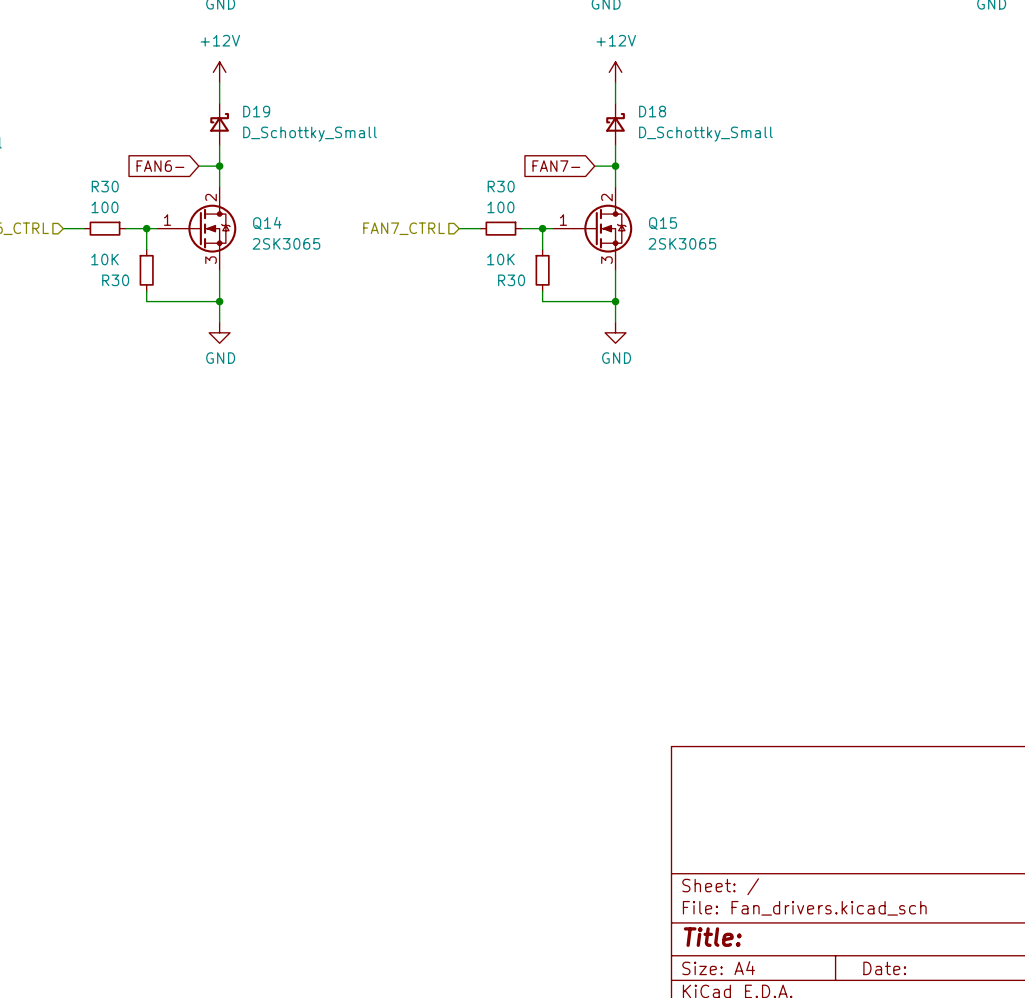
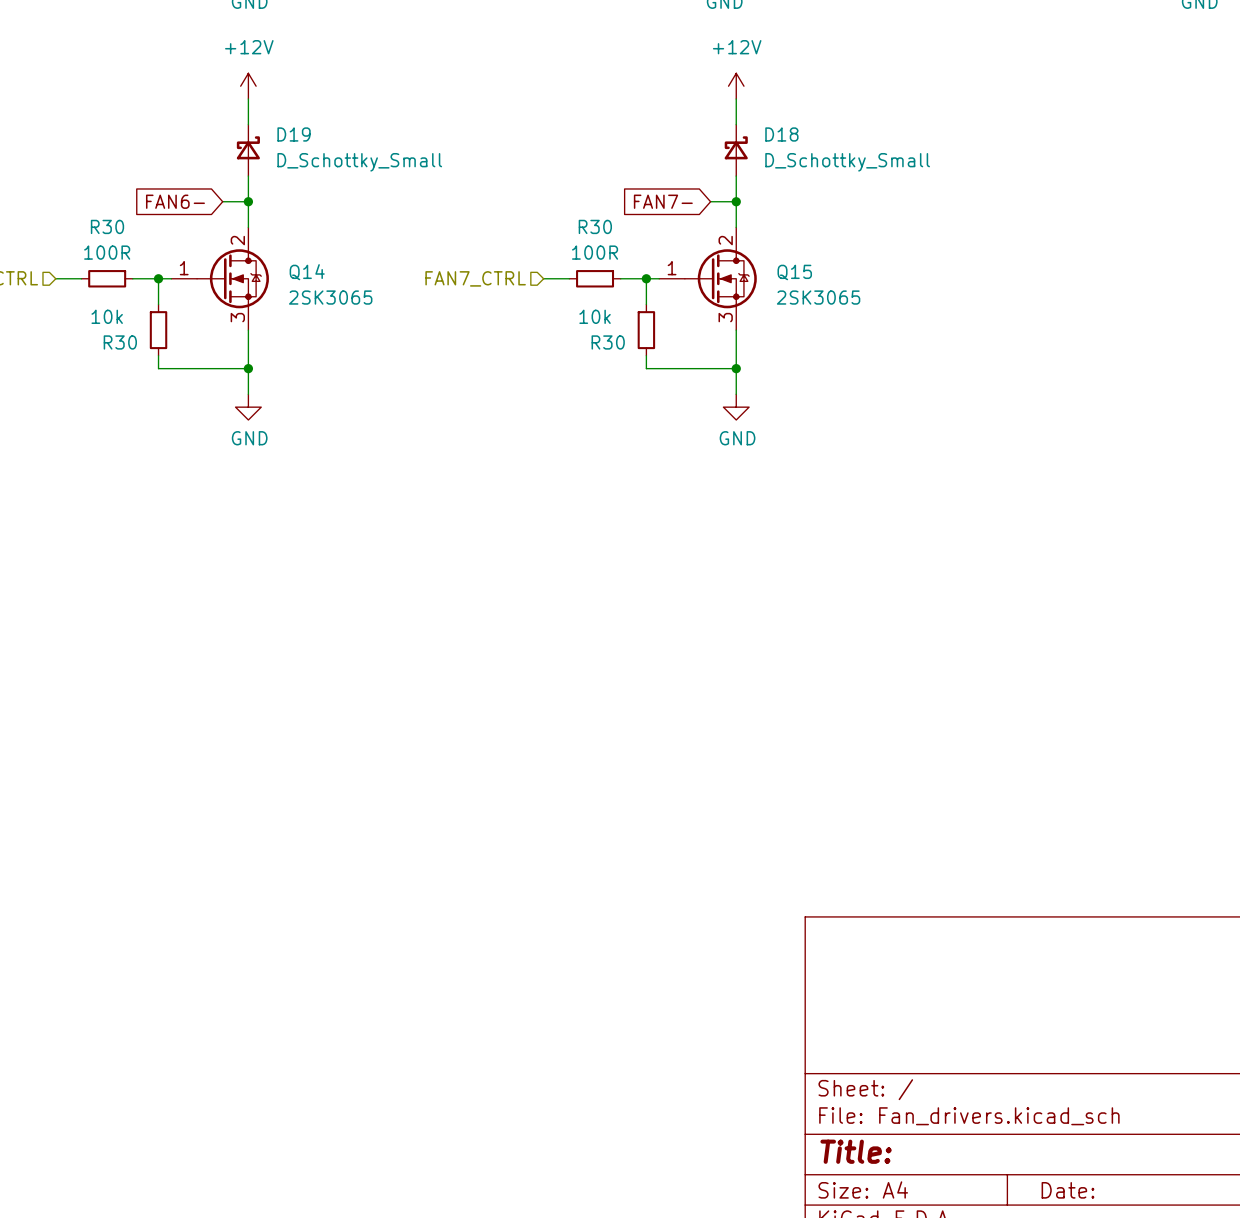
R30 value: 100 (105, 207) -> 100R (107, 252)
R30 value: 100 (500, 207) -> 100R (595, 252)
R30 value: 10K (105, 259) -> 10k (107, 316)
R30 value: 10K (500, 259) -> 10k (595, 316)

